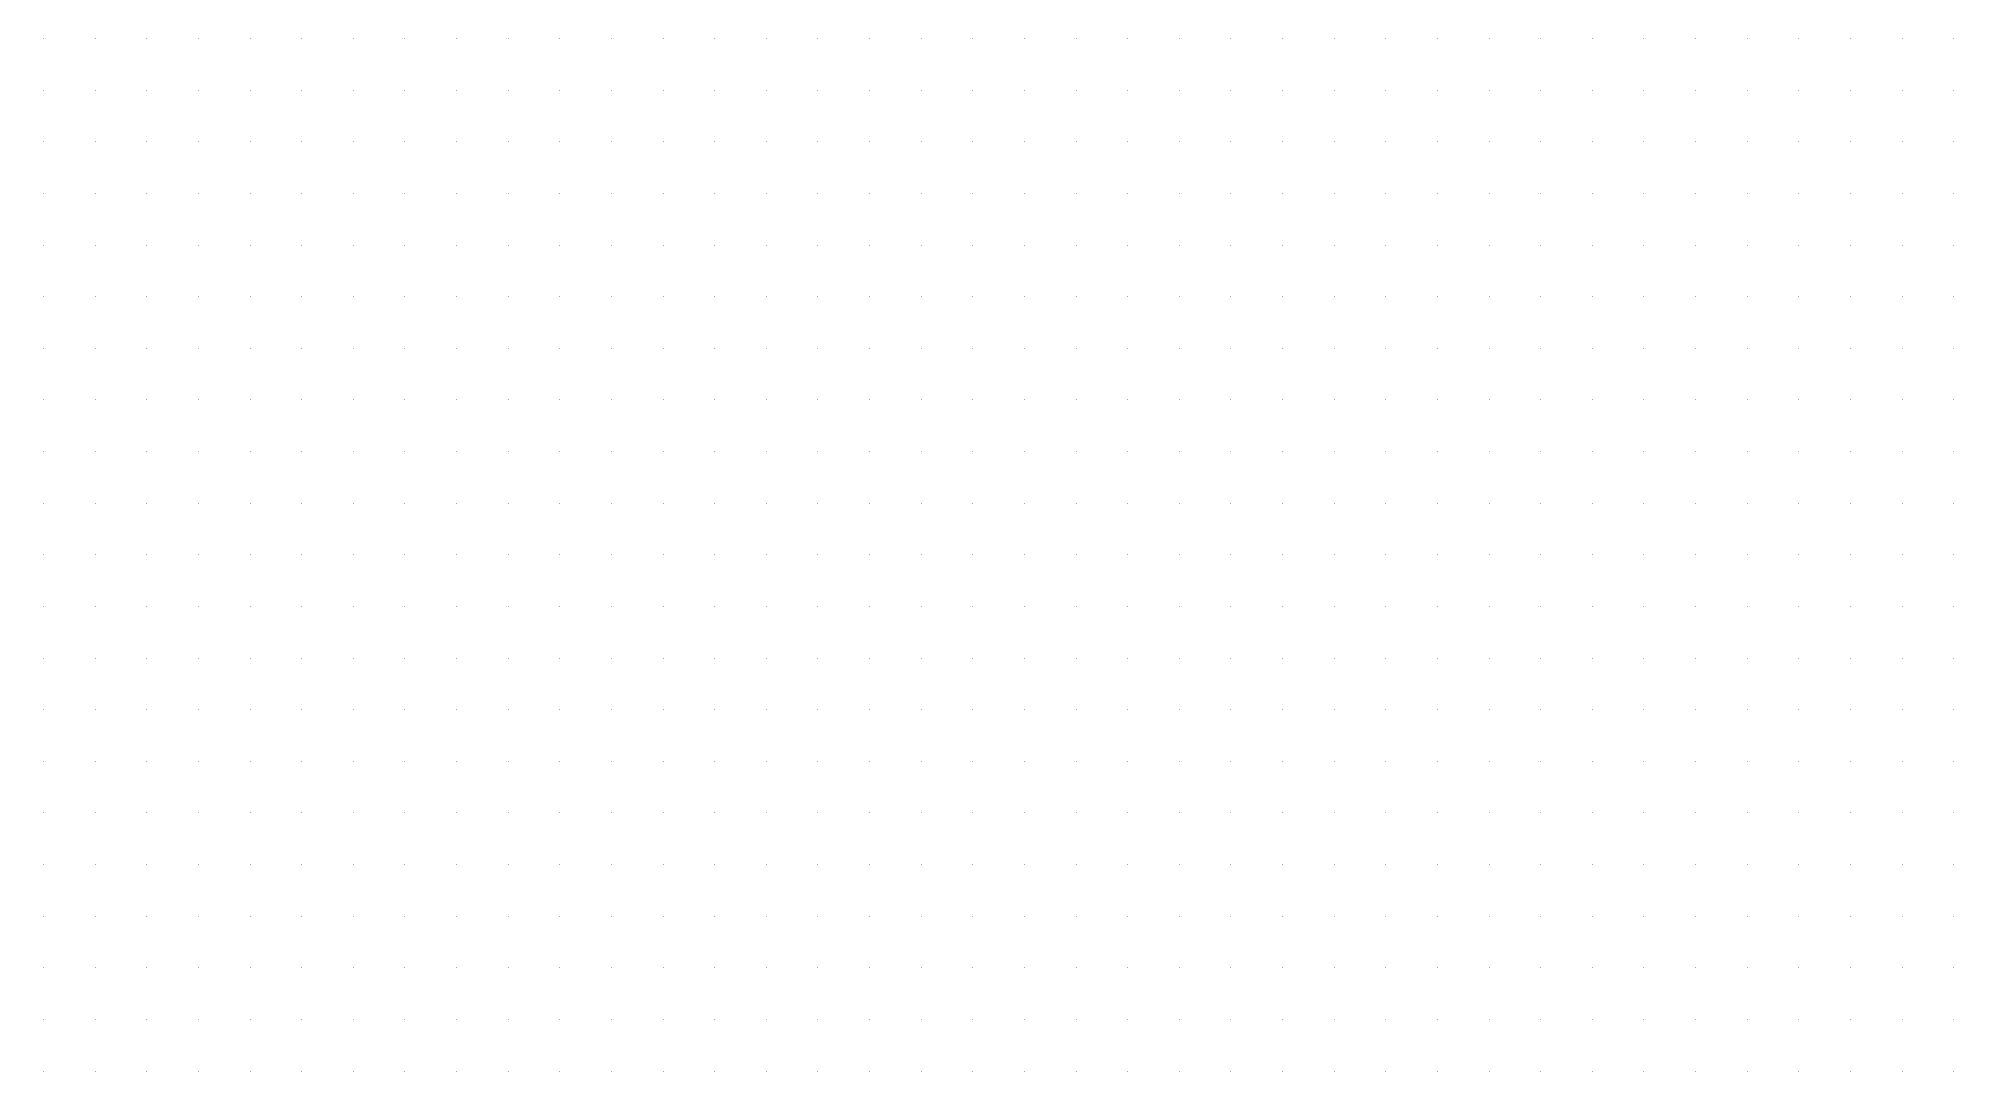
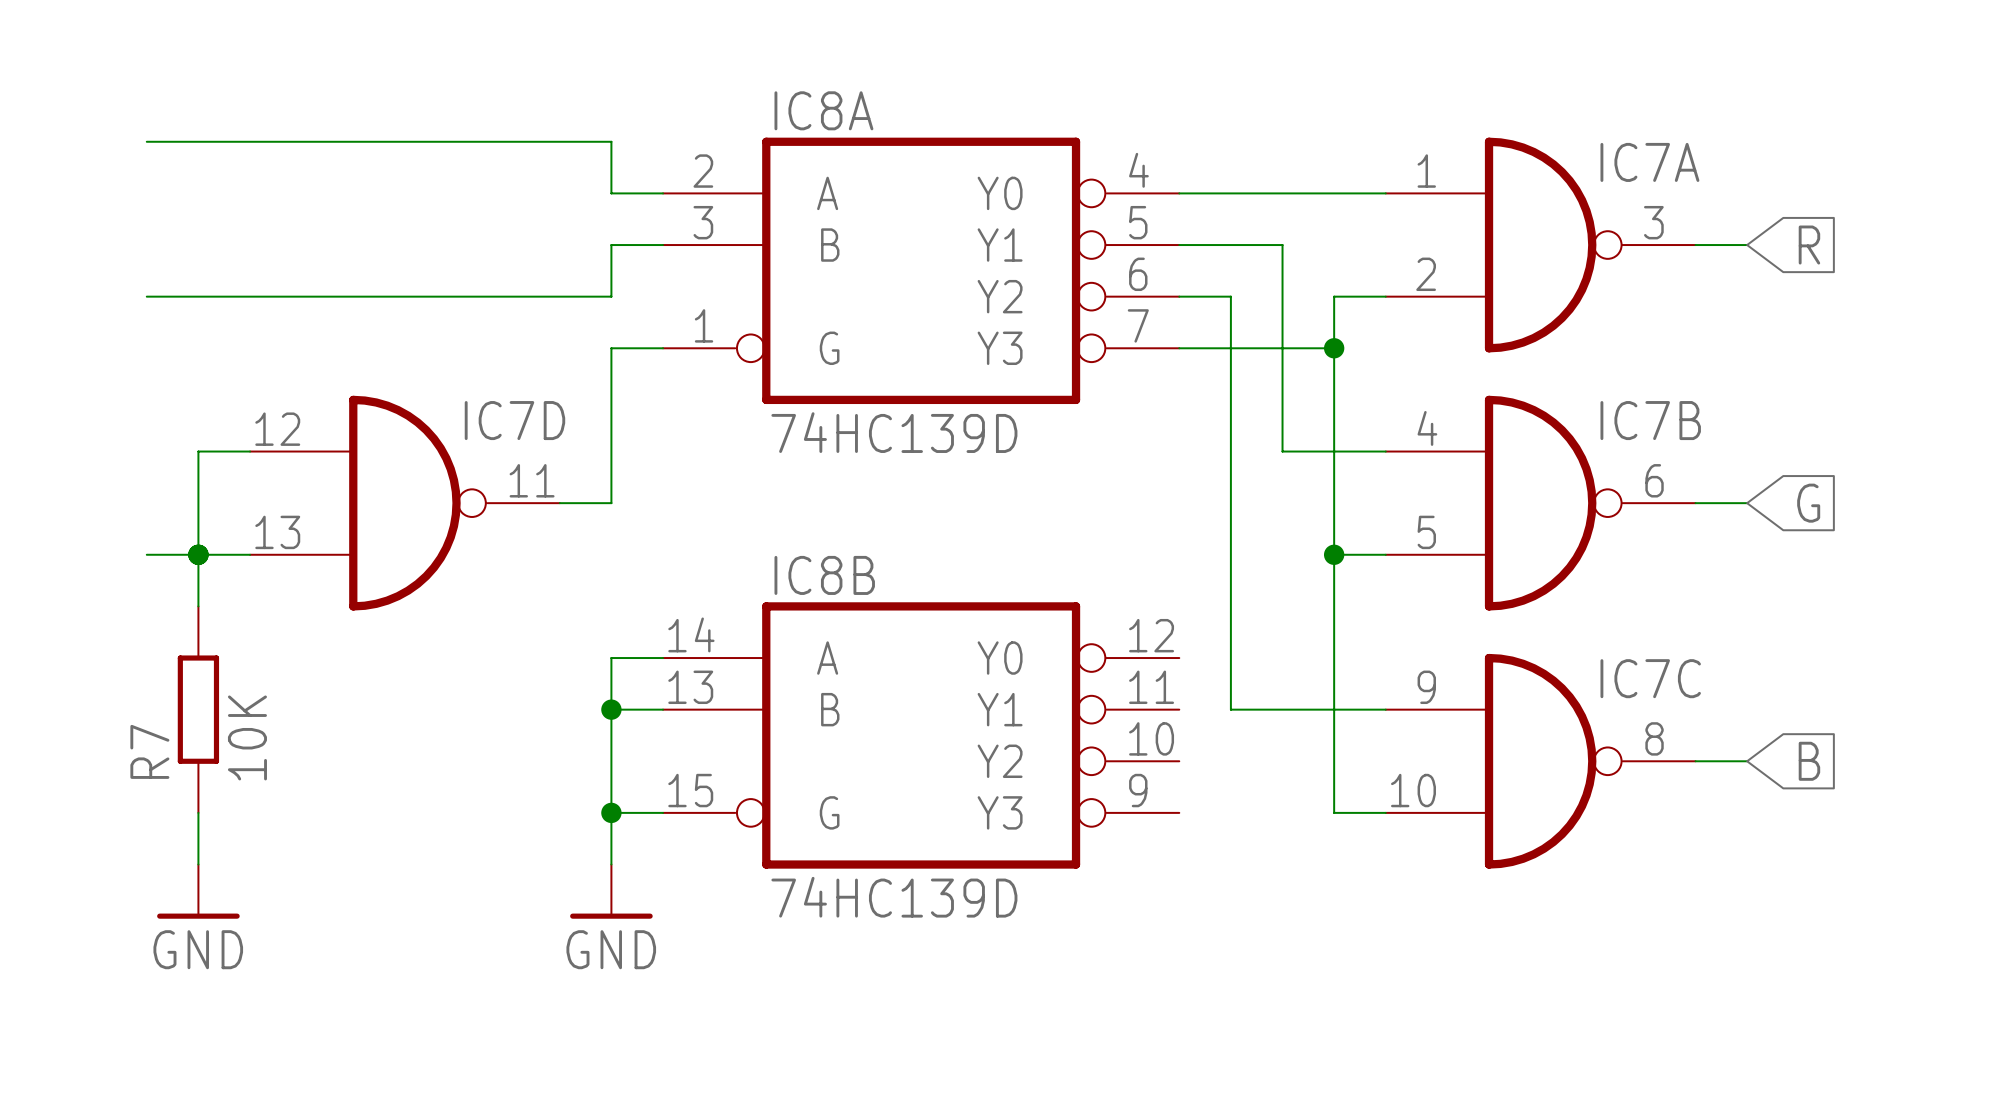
wire: none -> (146, 141) (611, 141) (611, 193) (663, 193)
wire: none -> (1179, 193) (1385, 193)
wire: none -> (663, 245) (611, 245) (611, 296) (146, 296)
wire: none -> (1179, 245) (1282, 245) (1282, 451) (1385, 451)
IC7A: none -> (1540, 245)
wire: none -> (1695, 245) (1747, 245)
global label: none -> R (1809, 245)
IC8A: none -> 74HC139D (921, 270)
wire: none -> (1179, 296) (1230, 296) (1230, 709) (1385, 709)
wire: none -> (1385, 296) (1334, 296) (1334, 812) (1385, 812)
wire: none -> (663, 348) (611, 348) (611, 503) (559, 503)
wire: none -> (1179, 348) (1334, 348)
junction: none -> (1334, 348)
wire: none -> (250, 451) (198, 451) (198, 606)
IC7D: none -> (404, 503)
IC7B: none -> (1540, 503)
wire: none -> (1695, 503) (1747, 503)
global label: none -> G (1808, 503)
wire: none -> (146, 554) (250, 554)
junction: none -> (198, 554)
wire: none -> (1334, 554) (1385, 554)
junction: none -> (1334, 554)
wire: none -> (663, 658) (611, 658) (611, 864)
R7: none -> 10K (198, 709)
wire: none -> (611, 709) (663, 709)
junction: none -> (611, 709)
IC8B: none -> 74HC139D (921, 735)
IC7C: none -> (1540, 761)
wire: none -> (1695, 761) (1747, 761)
global label: none -> B (1809, 761)
wire: none -> (198, 812) (198, 864)
wire: none -> (611, 812) (663, 812)
junction: none -> (611, 812)
power symbol: none -> GND (198, 891)
power symbol: none -> GND (611, 891)

